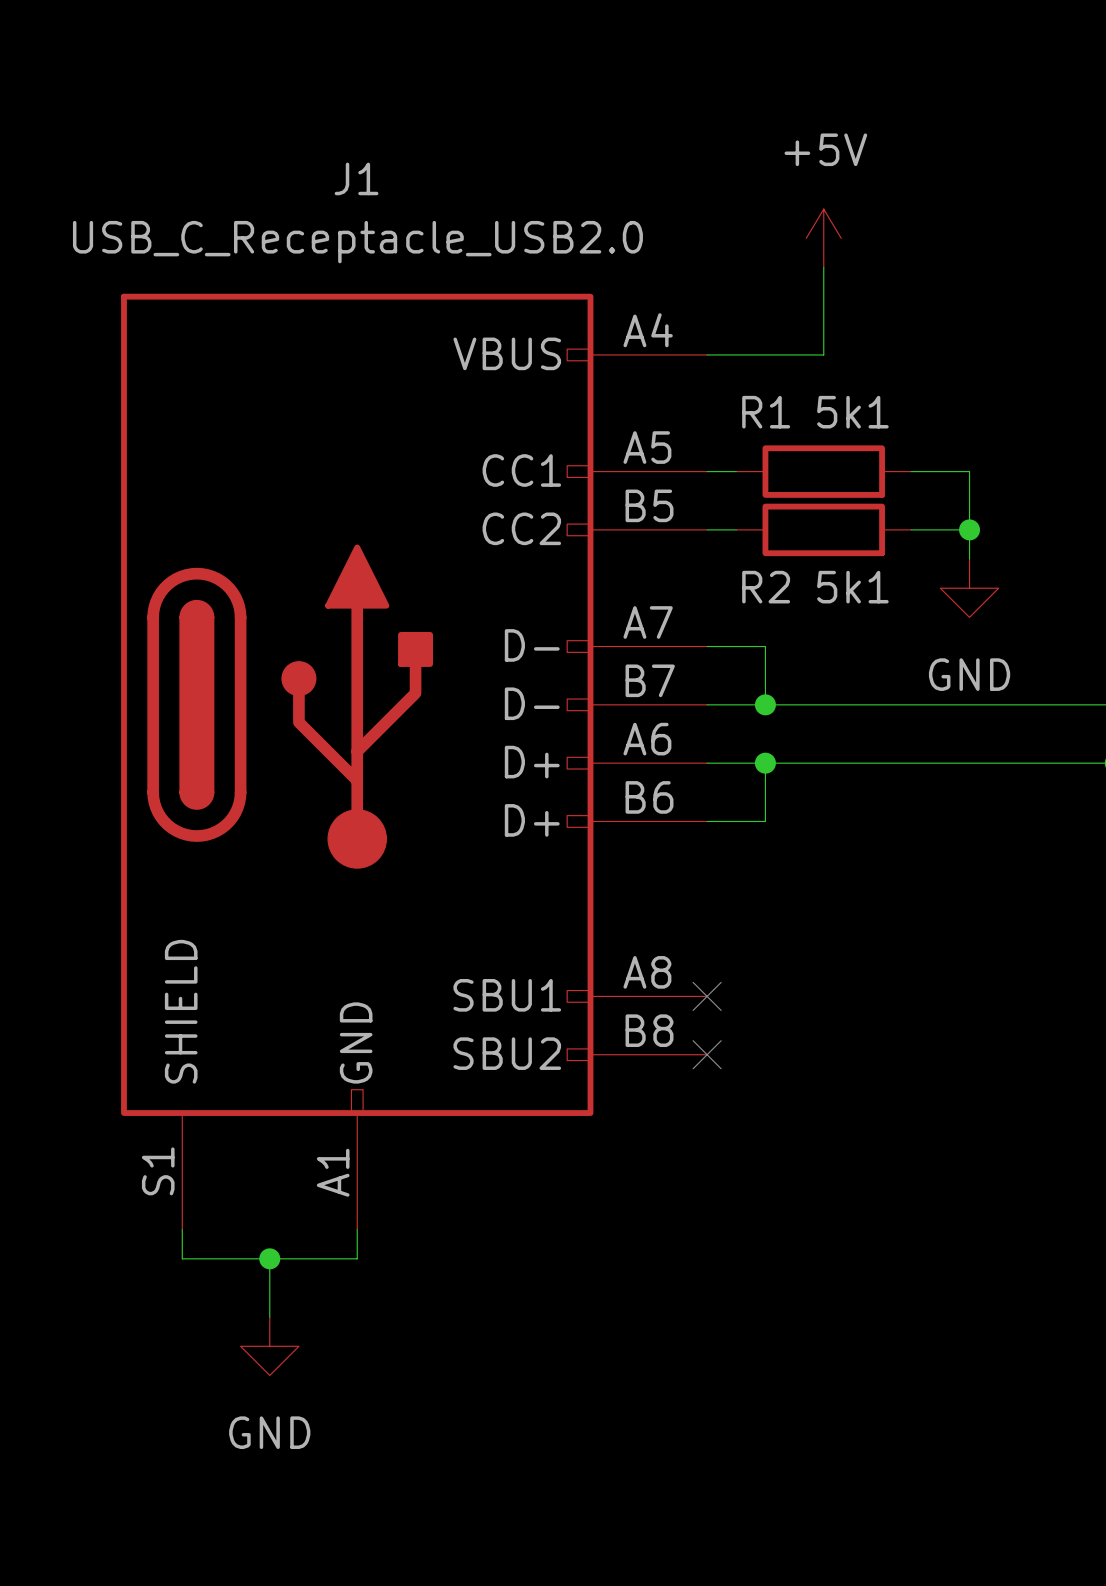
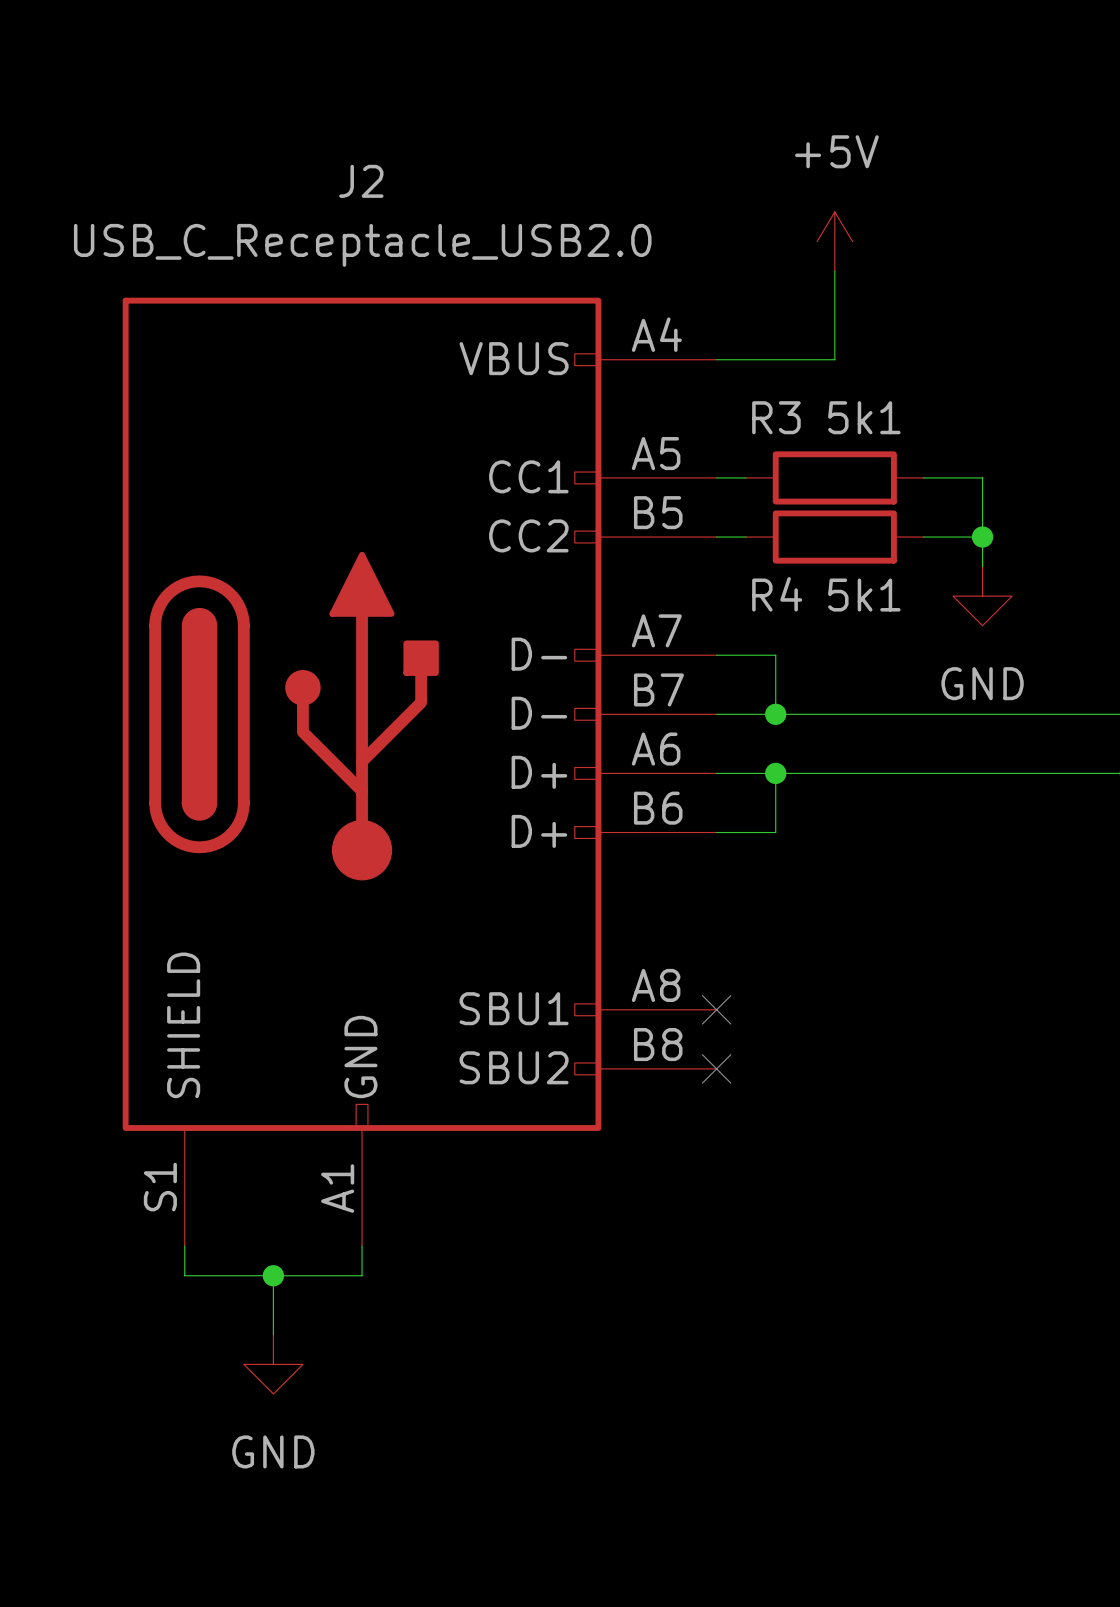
J1 name: J1 (356, 178) -> J2 (361, 181)
R1 name: R1 (766, 412) -> R3 (776, 417)
R2 name: R2 (766, 587) -> R4 (777, 594)

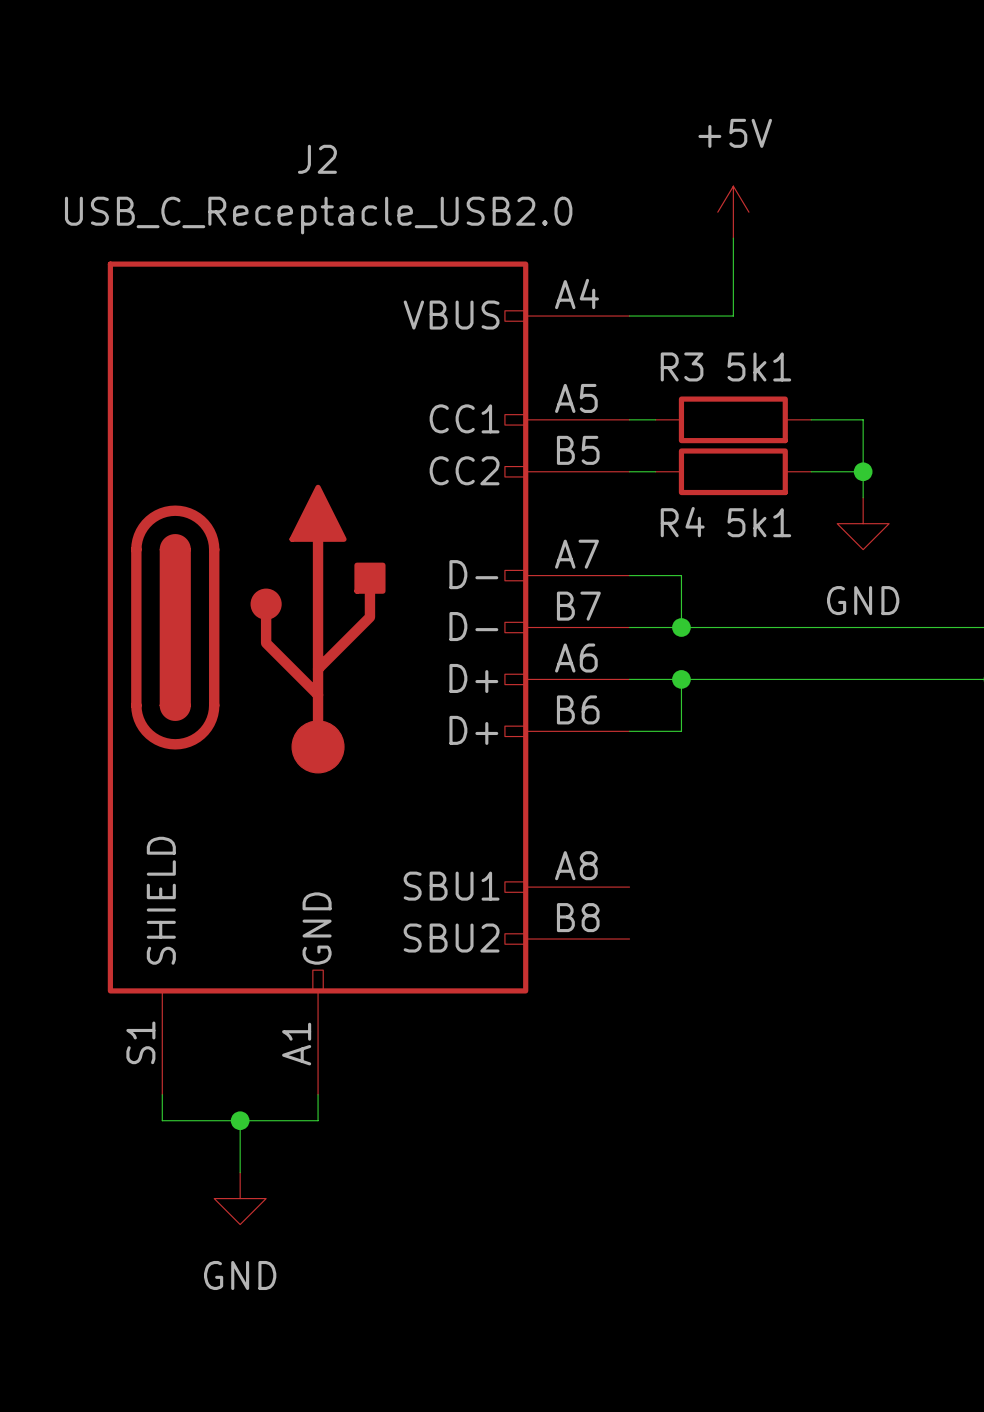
no-connect mark: (716, 1009) -> none
no-connect mark: (716, 1068) -> none

